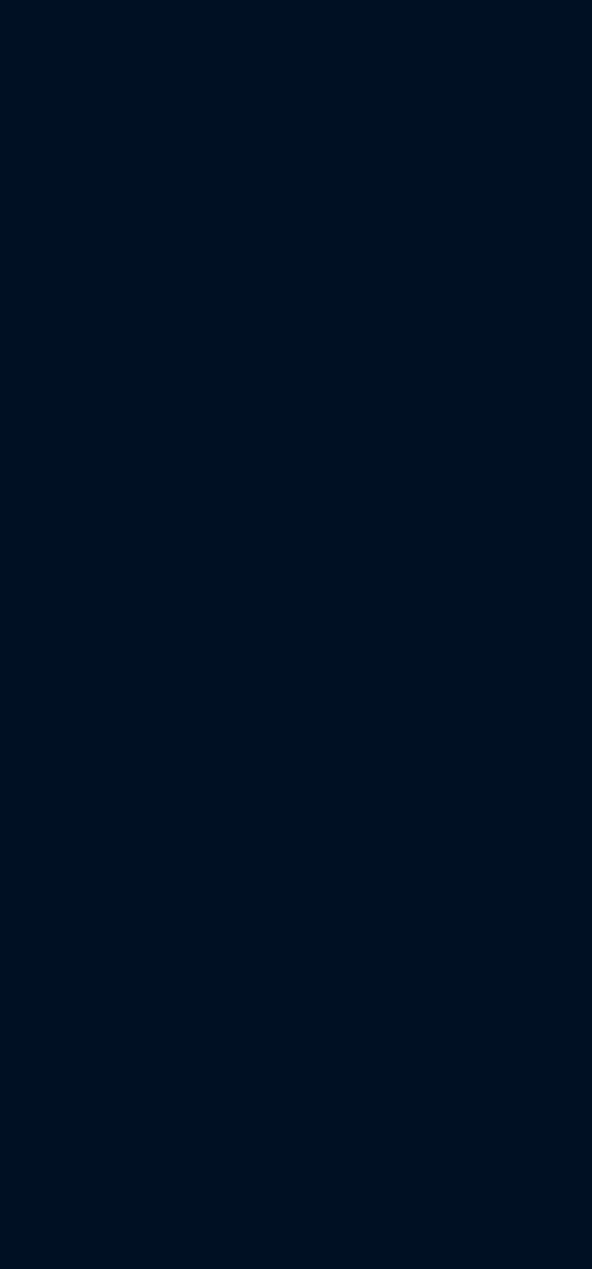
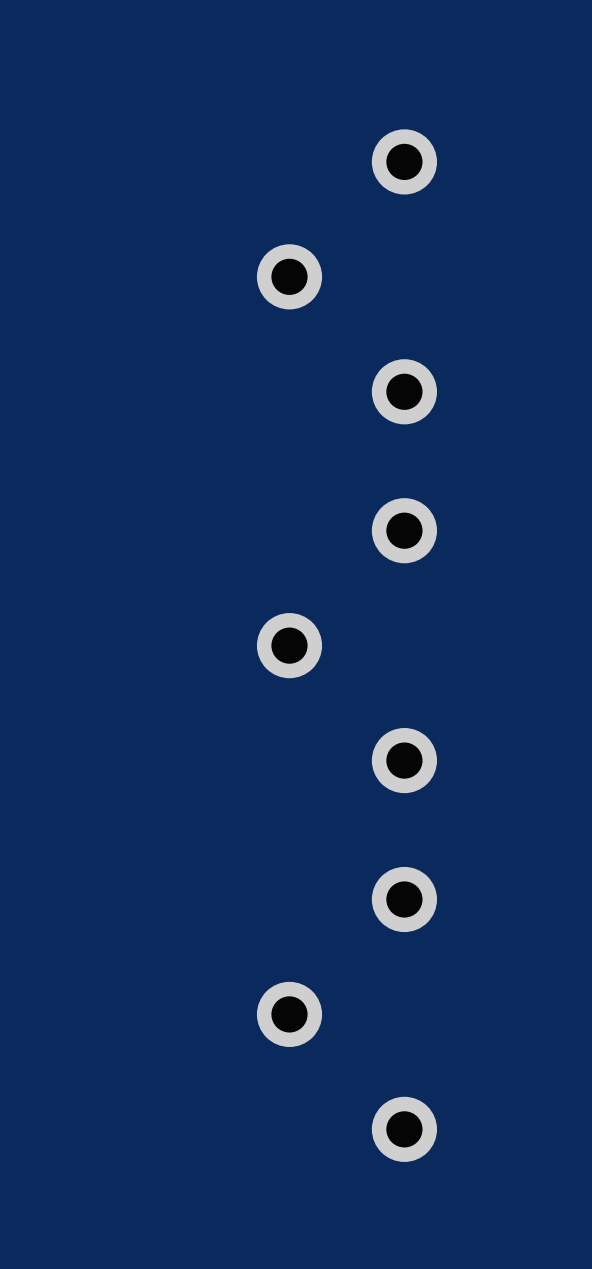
part: none -> (346, 276)
part: none -> (346, 645)
part: none -> (346, 1014)

